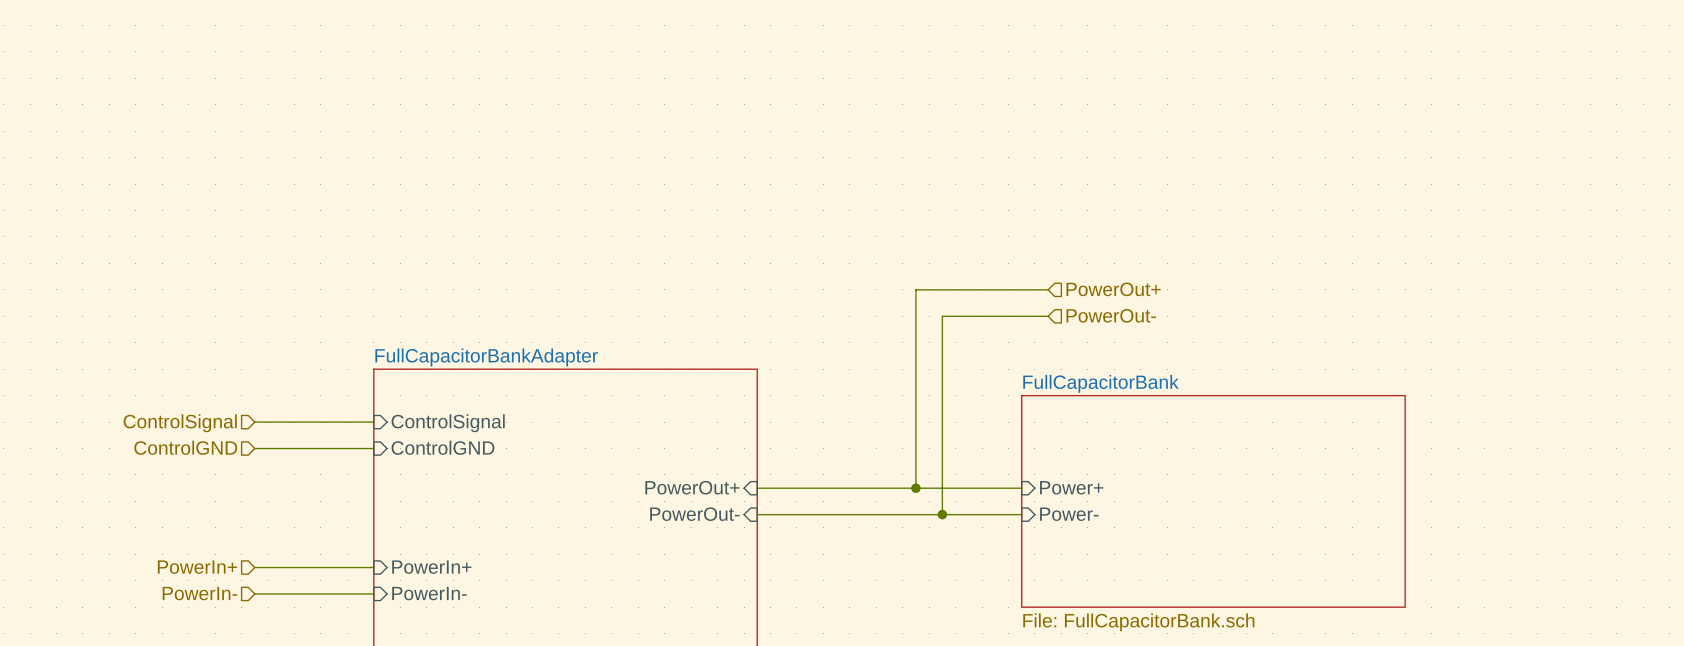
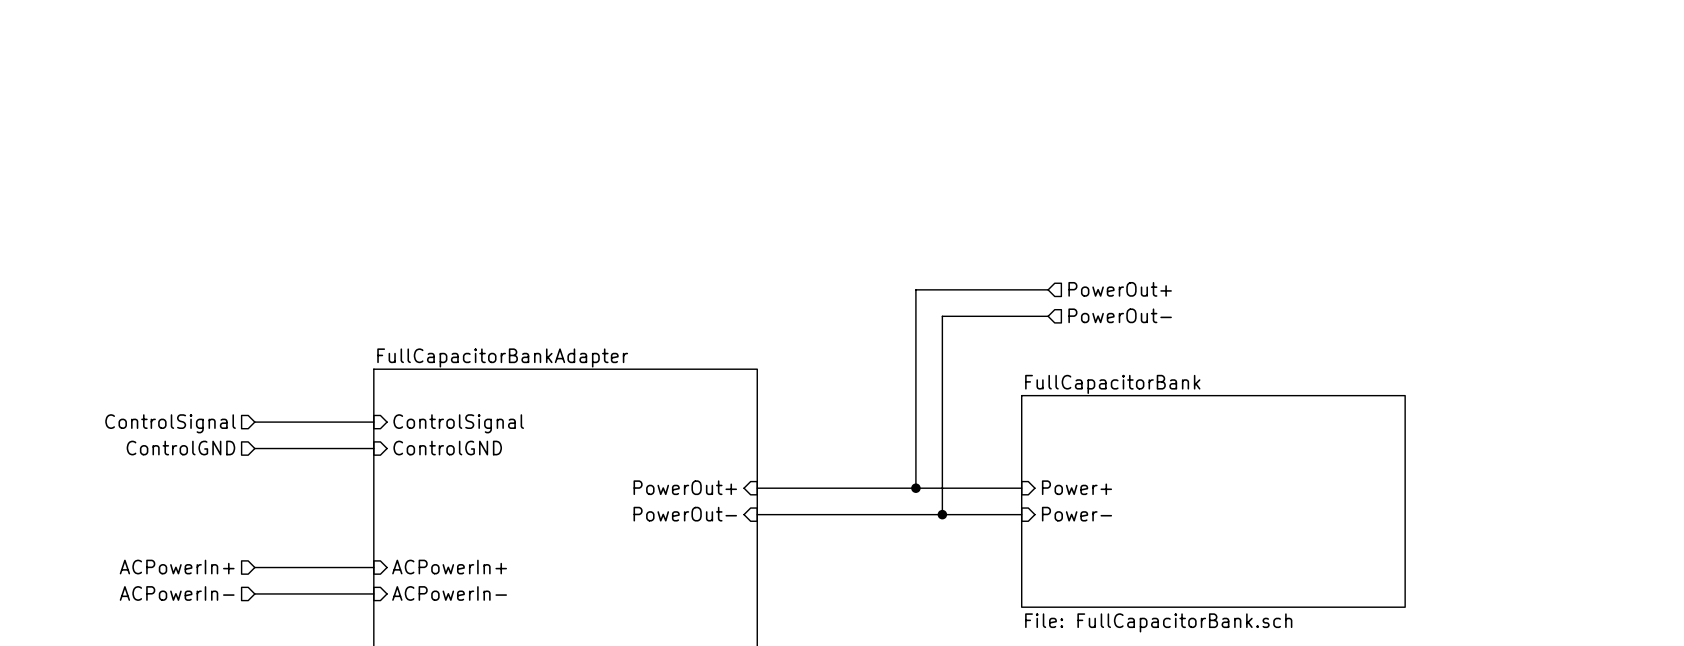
hierarchical label: PowerIn+ (197, 567) -> ACPowerIn+ (177, 567)
sheet pin: PowerIn+ (431, 567) -> ACPowerIn+ (449, 567)
hierarchical label: PowerIn- (199, 593) -> ACPowerIn- (177, 593)
sheet pin: PowerIn- (429, 593) -> ACPowerIn- (449, 593)

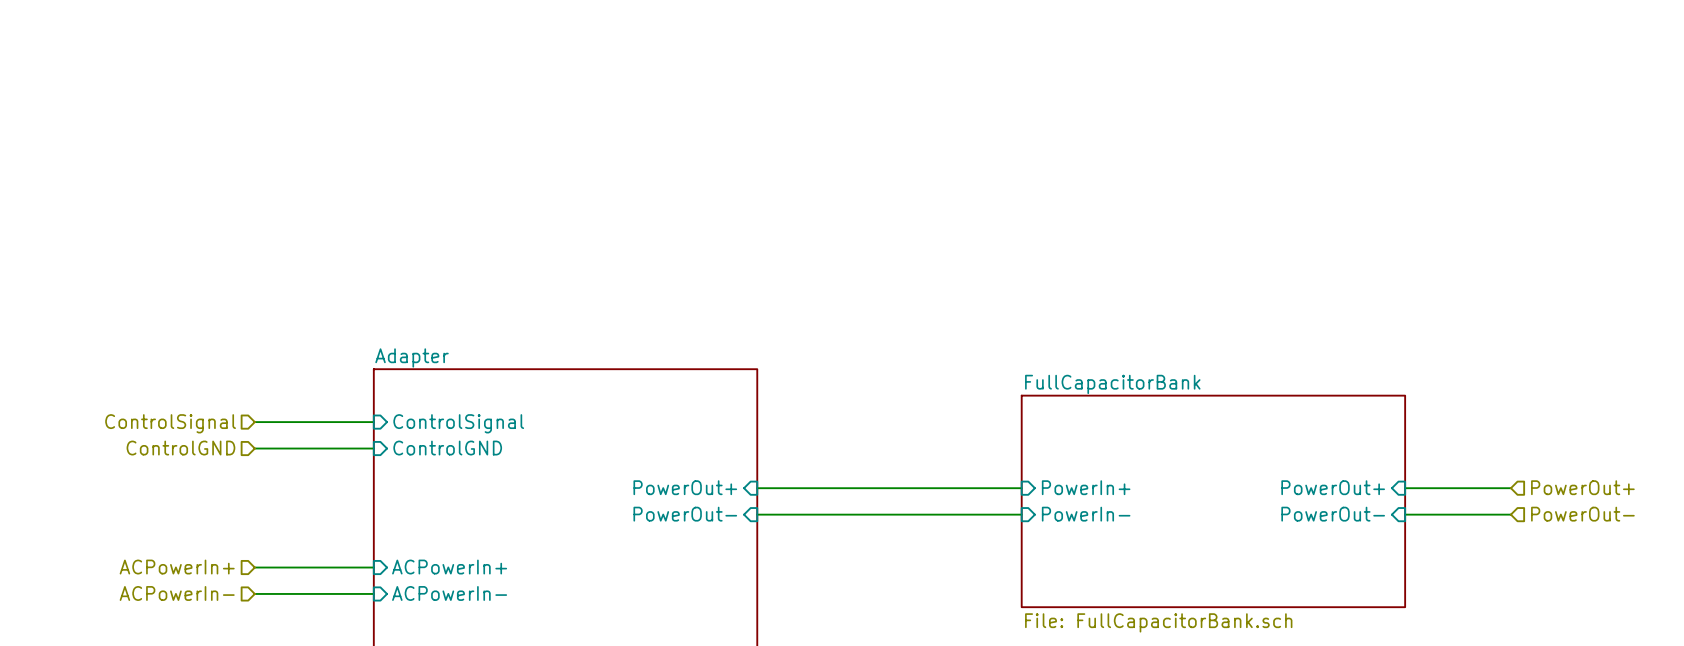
wire: (1048, 289) (915, 289) (915, 488) -> none
hierarchical label: PowerOut+ (1120, 289) -> none
hierarchical label: PowerOut- (1120, 315) -> none
wire: (1048, 316) (942, 316) (942, 514) -> none
sheet FullCapacitorBankAdapter name: FullCapacitorBankAdapter (502, 357) -> Adapter (412, 357)
sheet pin: Power+ (1077, 487) -> PowerIn+ (1086, 487)
sheet pin: none -> PowerOut+ (1333, 487)
hierarchical label: none -> PowerOut+ (1582, 487)
junction: (915, 488) -> none
wire: none -> (1405, 488) (1510, 488)
junction: (942, 514) -> none
sheet pin: Power- (1077, 514) -> PowerIn- (1086, 514)
sheet pin: none -> PowerOut- (1333, 514)
wire: none -> (1405, 514) (1510, 514)
hierarchical label: none -> PowerOut- (1582, 514)

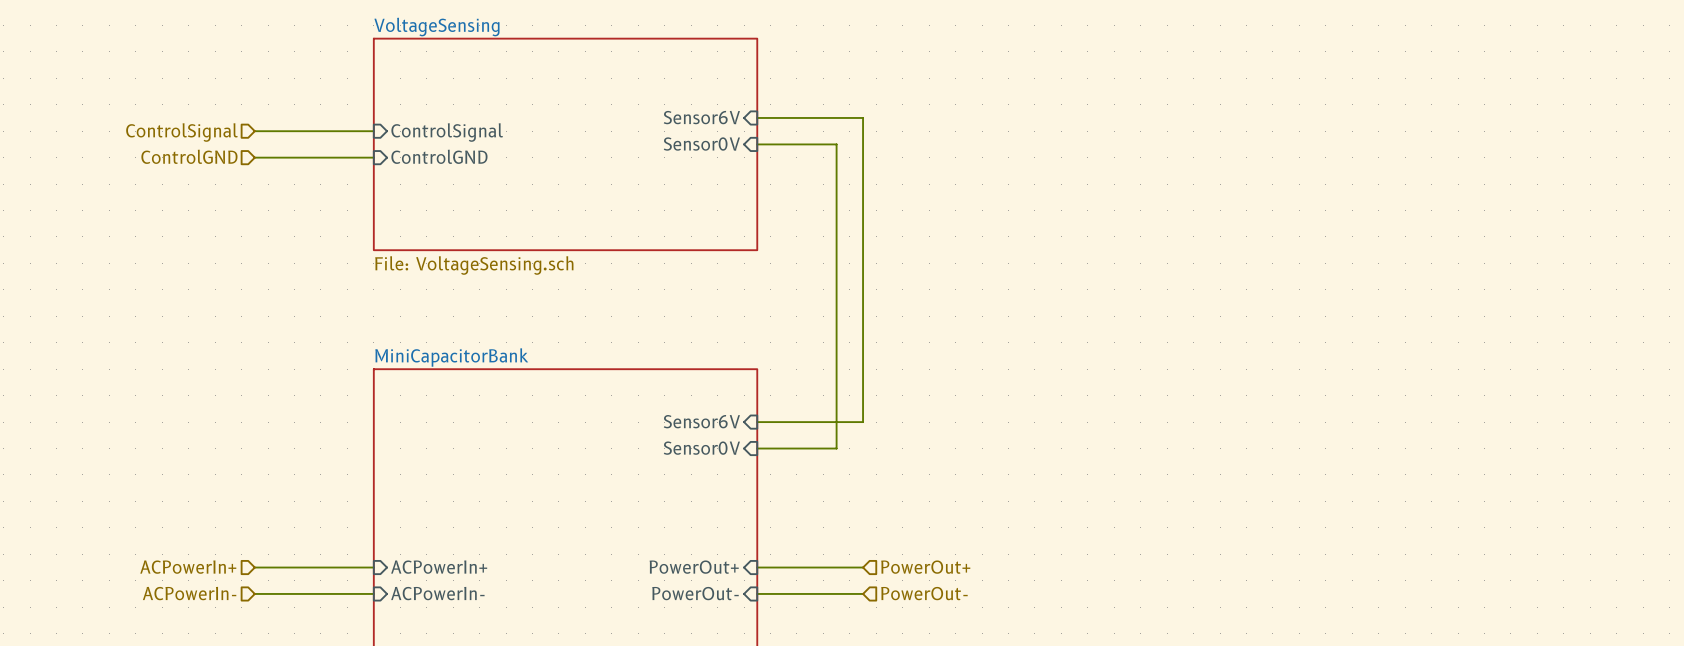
sheet pin: none -> Sensor6V (701, 117)
wire: none -> (757, 117) (863, 117) (863, 422) (757, 422)
wire: none -> (254, 131) (373, 131)
hierarchical label: none -> ControlSignal (181, 132)
sheet pin: none -> ControlSignal (447, 132)
sheet pin: none -> Sensor0V (701, 144)
sheet VoltageSensing: none -> File: VoltageSensing.sch (565, 144)
wire: none -> (757, 144) (836, 144) (836, 448) (757, 448)
hierarchical label: none -> ControlGND (189, 156)
wire: none -> (254, 157) (373, 157)
sheet pin: none -> ControlGND (439, 156)
sheet Adapter name: Adapter (412, 357) -> MiniCapacitorBank (451, 357)
sheet pin: none -> Sensor6V (701, 421)
wire: (254, 422) (373, 422) -> none
hierarchical label: ControlSignal (170, 423) -> none
sheet pin: ControlSignal (458, 423) -> none
hierarchical label: ControlGND (180, 448) -> none
wire: (254, 448) (373, 448) -> none
sheet pin: ControlGND (447, 448) -> none
sheet pin: none -> Sensor0V (701, 448)
sheet pin position: PowerOut+ (685, 487) -> PowerOut+ (694, 567)
sheet pin: PowerIn+ (1086, 487) -> none
sheet pin: PowerOut+ (1333, 487) -> none
hierarchical label: PowerOut+ (1582, 487) -> none
wire: (757, 488) (1021, 488) -> none
wire: (1405, 488) (1510, 488) -> none
sheet FullCapacitorBank: File: FullCapacitorBank.sch (1213, 501) -> none
sheet pin position: PowerOut- (685, 514) -> PowerOut- (695, 593)
wire: (757, 514) (1021, 514) -> none
sheet pin: PowerIn- (1086, 514) -> none
sheet pin: PowerOut- (1333, 514) -> none
wire: (1405, 514) (1510, 514) -> none
hierarchical label: PowerOut- (1582, 514) -> none
wire: none -> (757, 567) (863, 567)
hierarchical label: none -> PowerOut+ (925, 567)
wire: none -> (757, 593) (863, 593)
hierarchical label: none -> PowerOut- (924, 593)

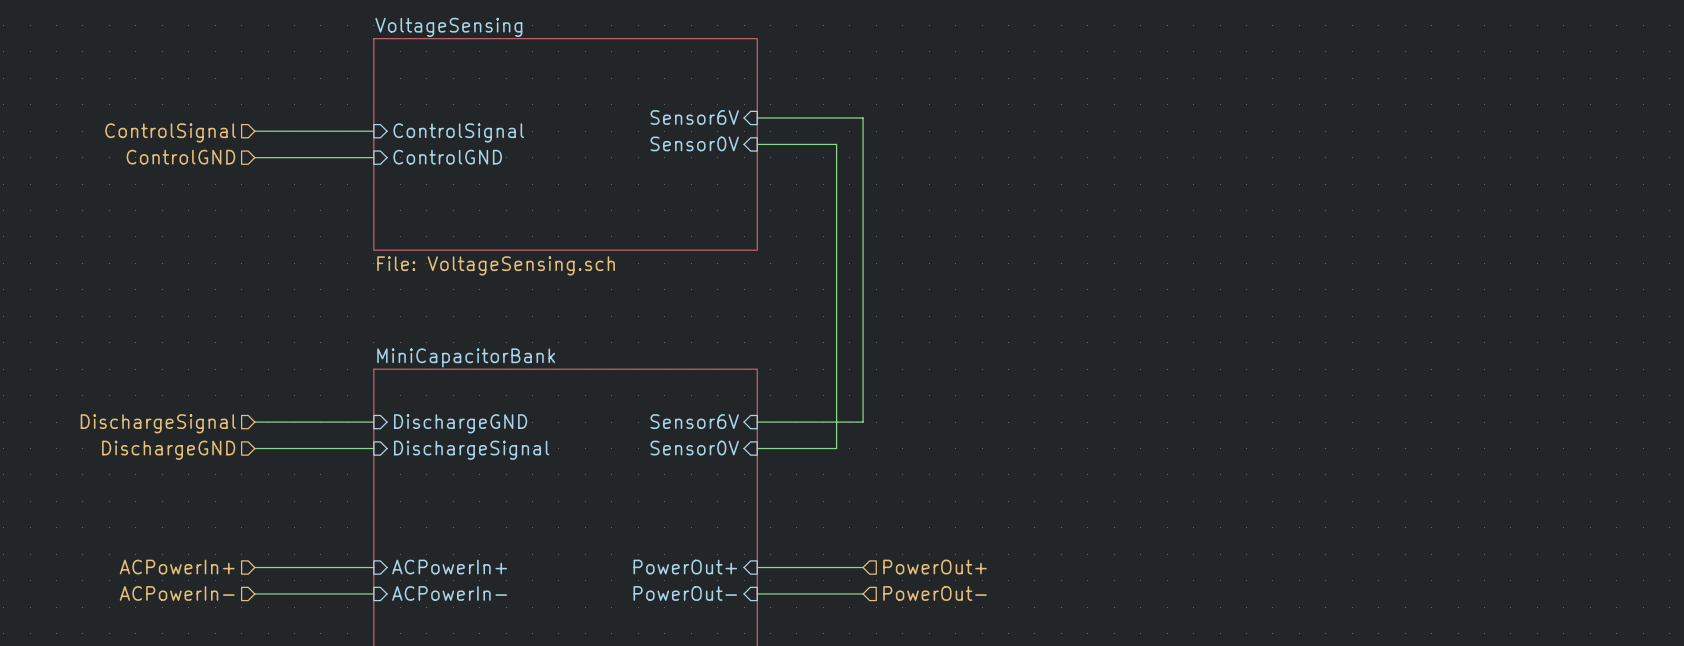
wire: none -> (254, 422) (373, 422)
hierarchical label: none -> DischargeSignal (158, 423)
sheet pin: none -> DischargeGND (460, 423)
wire: none -> (254, 448) (373, 448)
hierarchical label: none -> DischargeGND (168, 450)
sheet pin: none -> DischargeSignal (471, 450)

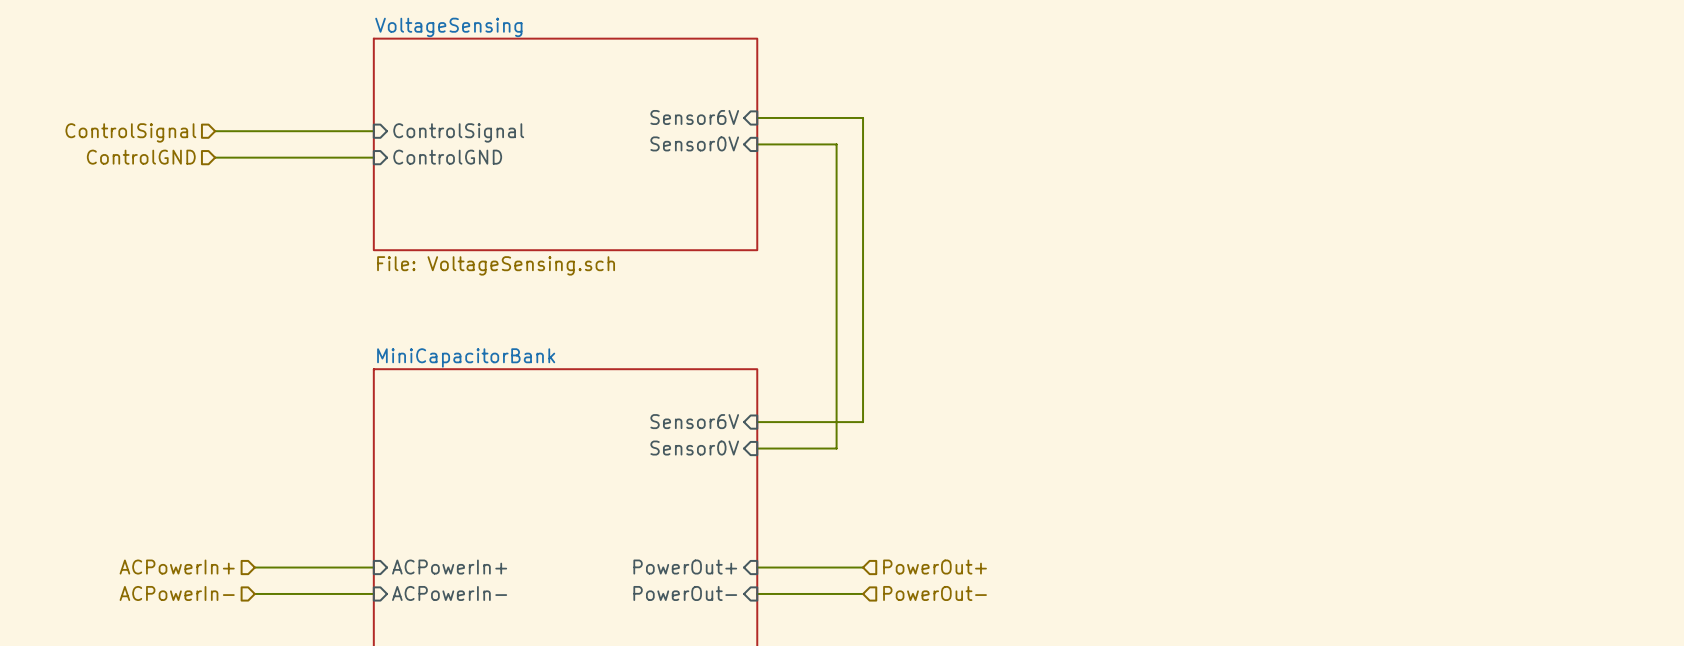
wire: none -> (215, 131) (254, 131)
hierarchical label position: ControlSignal (170, 132) -> ControlSignal (130, 132)
hierarchical label position: ControlGND (180, 157) -> ControlGND (141, 157)
wire: none -> (215, 157) (254, 157)
wire: (254, 422) (373, 422) -> none
hierarchical label: DischargeSignal (158, 423) -> none
sheet pin: DischargeGND (460, 423) -> none
wire: (254, 448) (373, 448) -> none
hierarchical label: DischargeGND (168, 450) -> none
sheet pin: DischargeSignal (471, 450) -> none

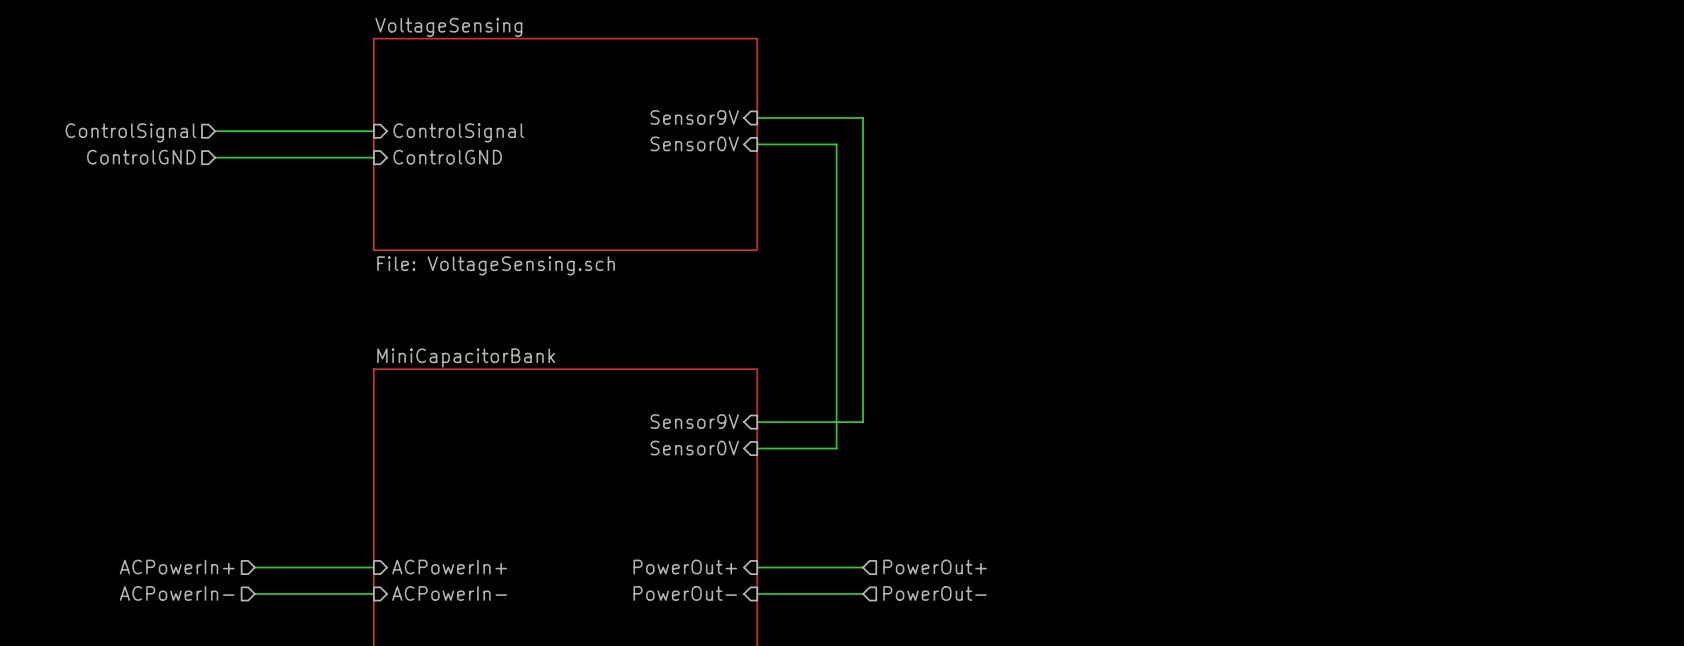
sheet pin: Sensor6V (694, 117) -> Sensor9V (694, 117)
sheet pin: Sensor6V (694, 421) -> Sensor9V (694, 421)

